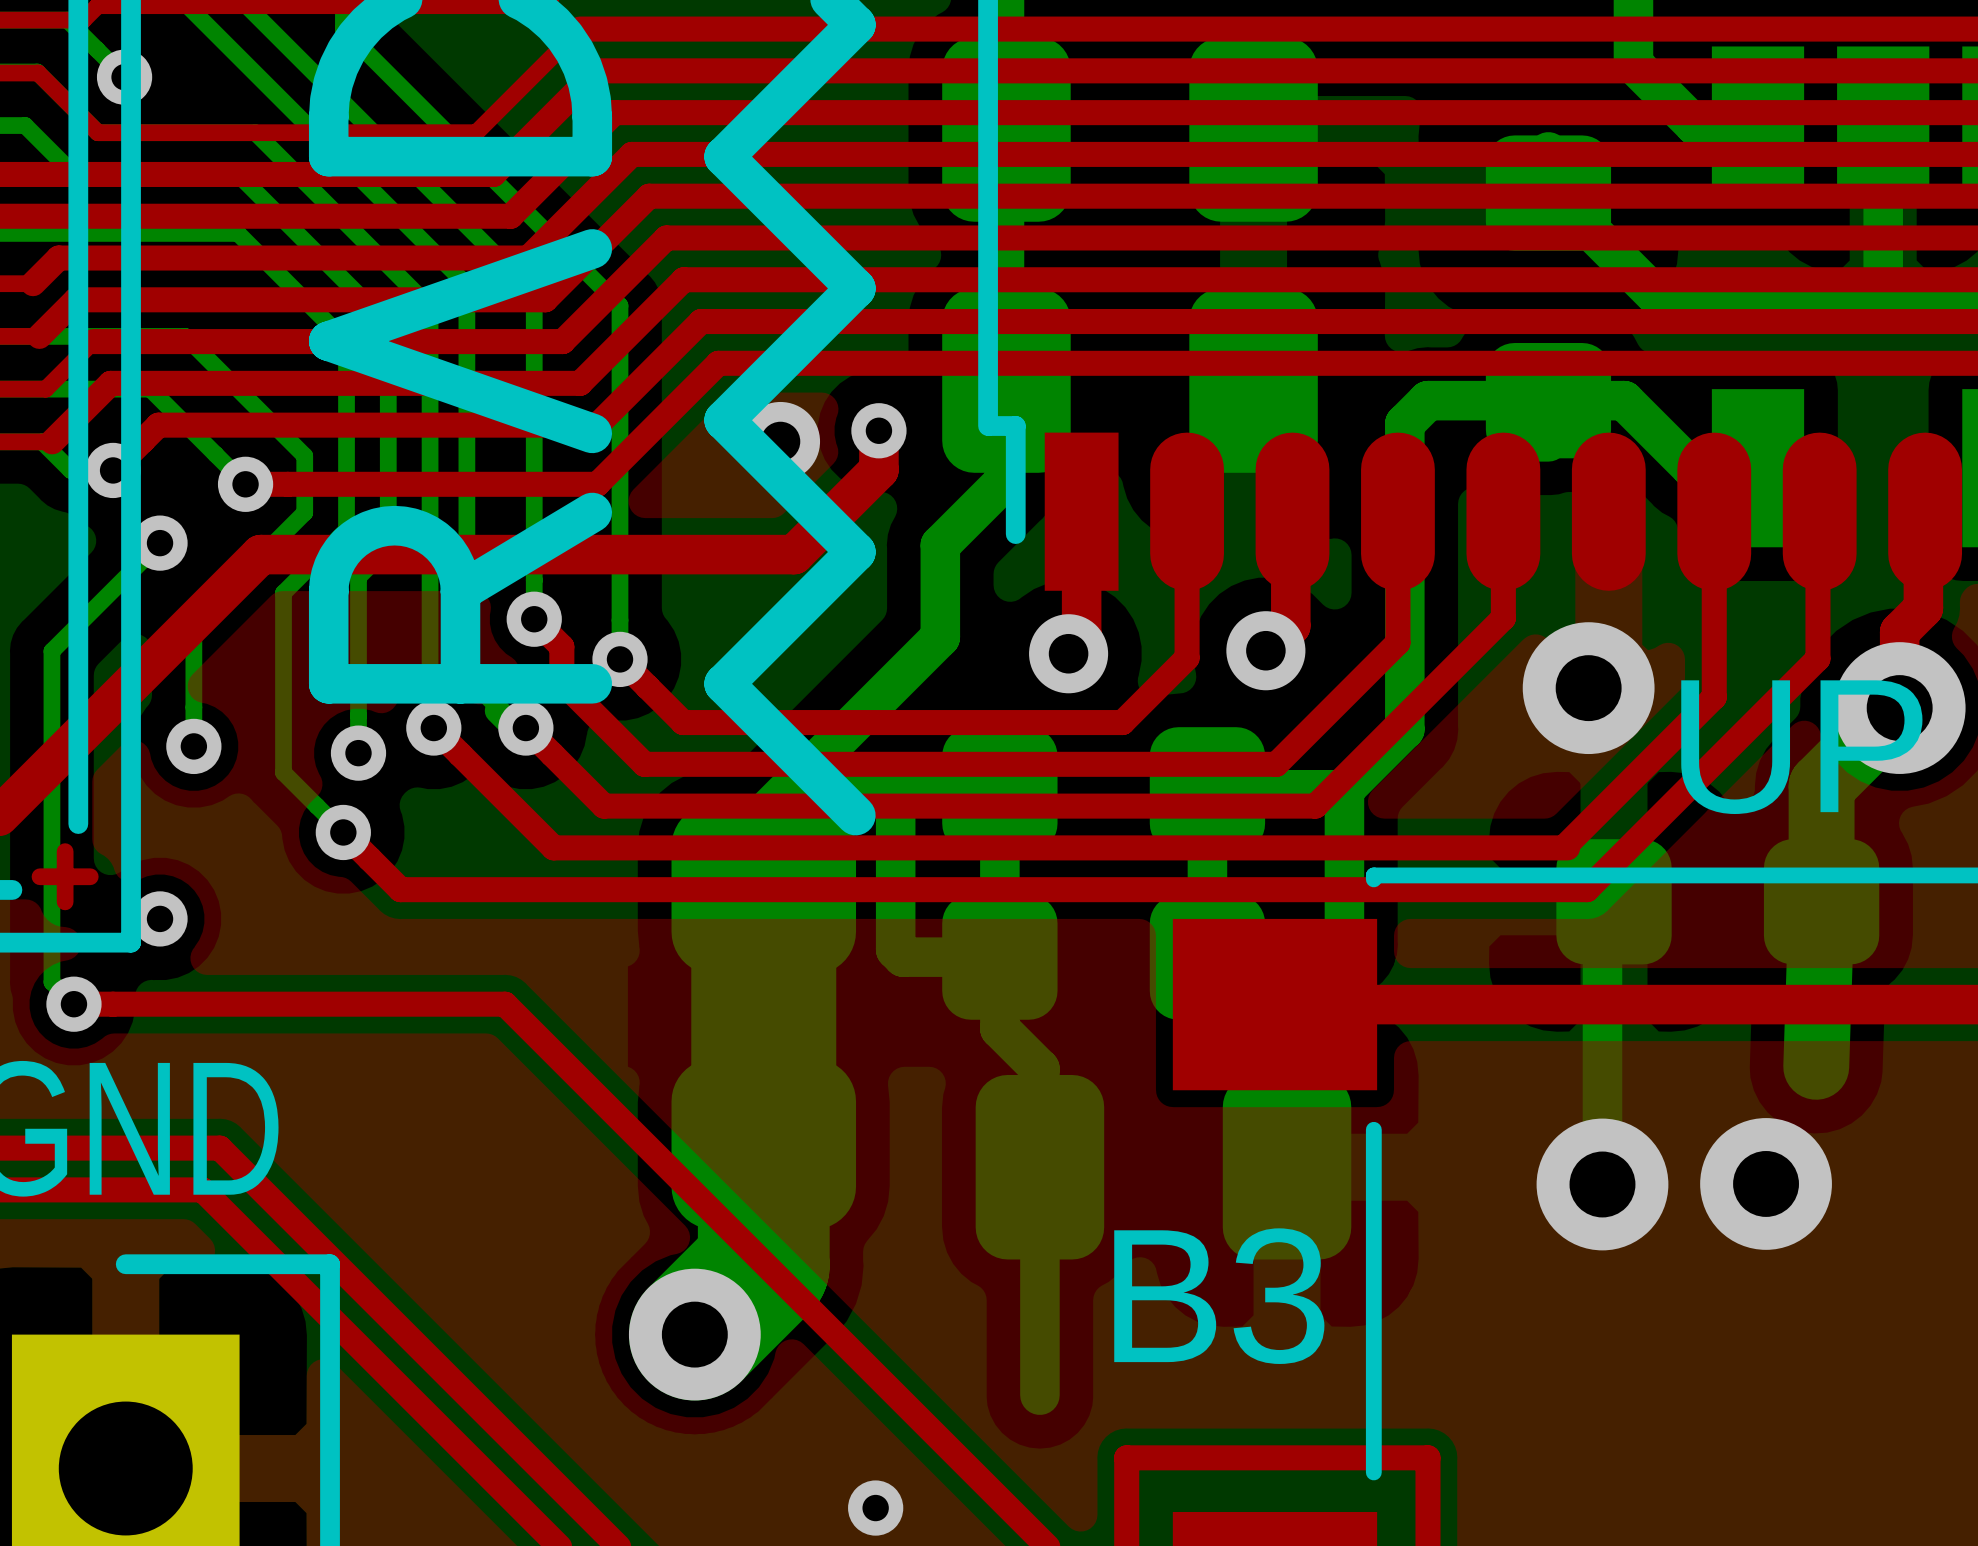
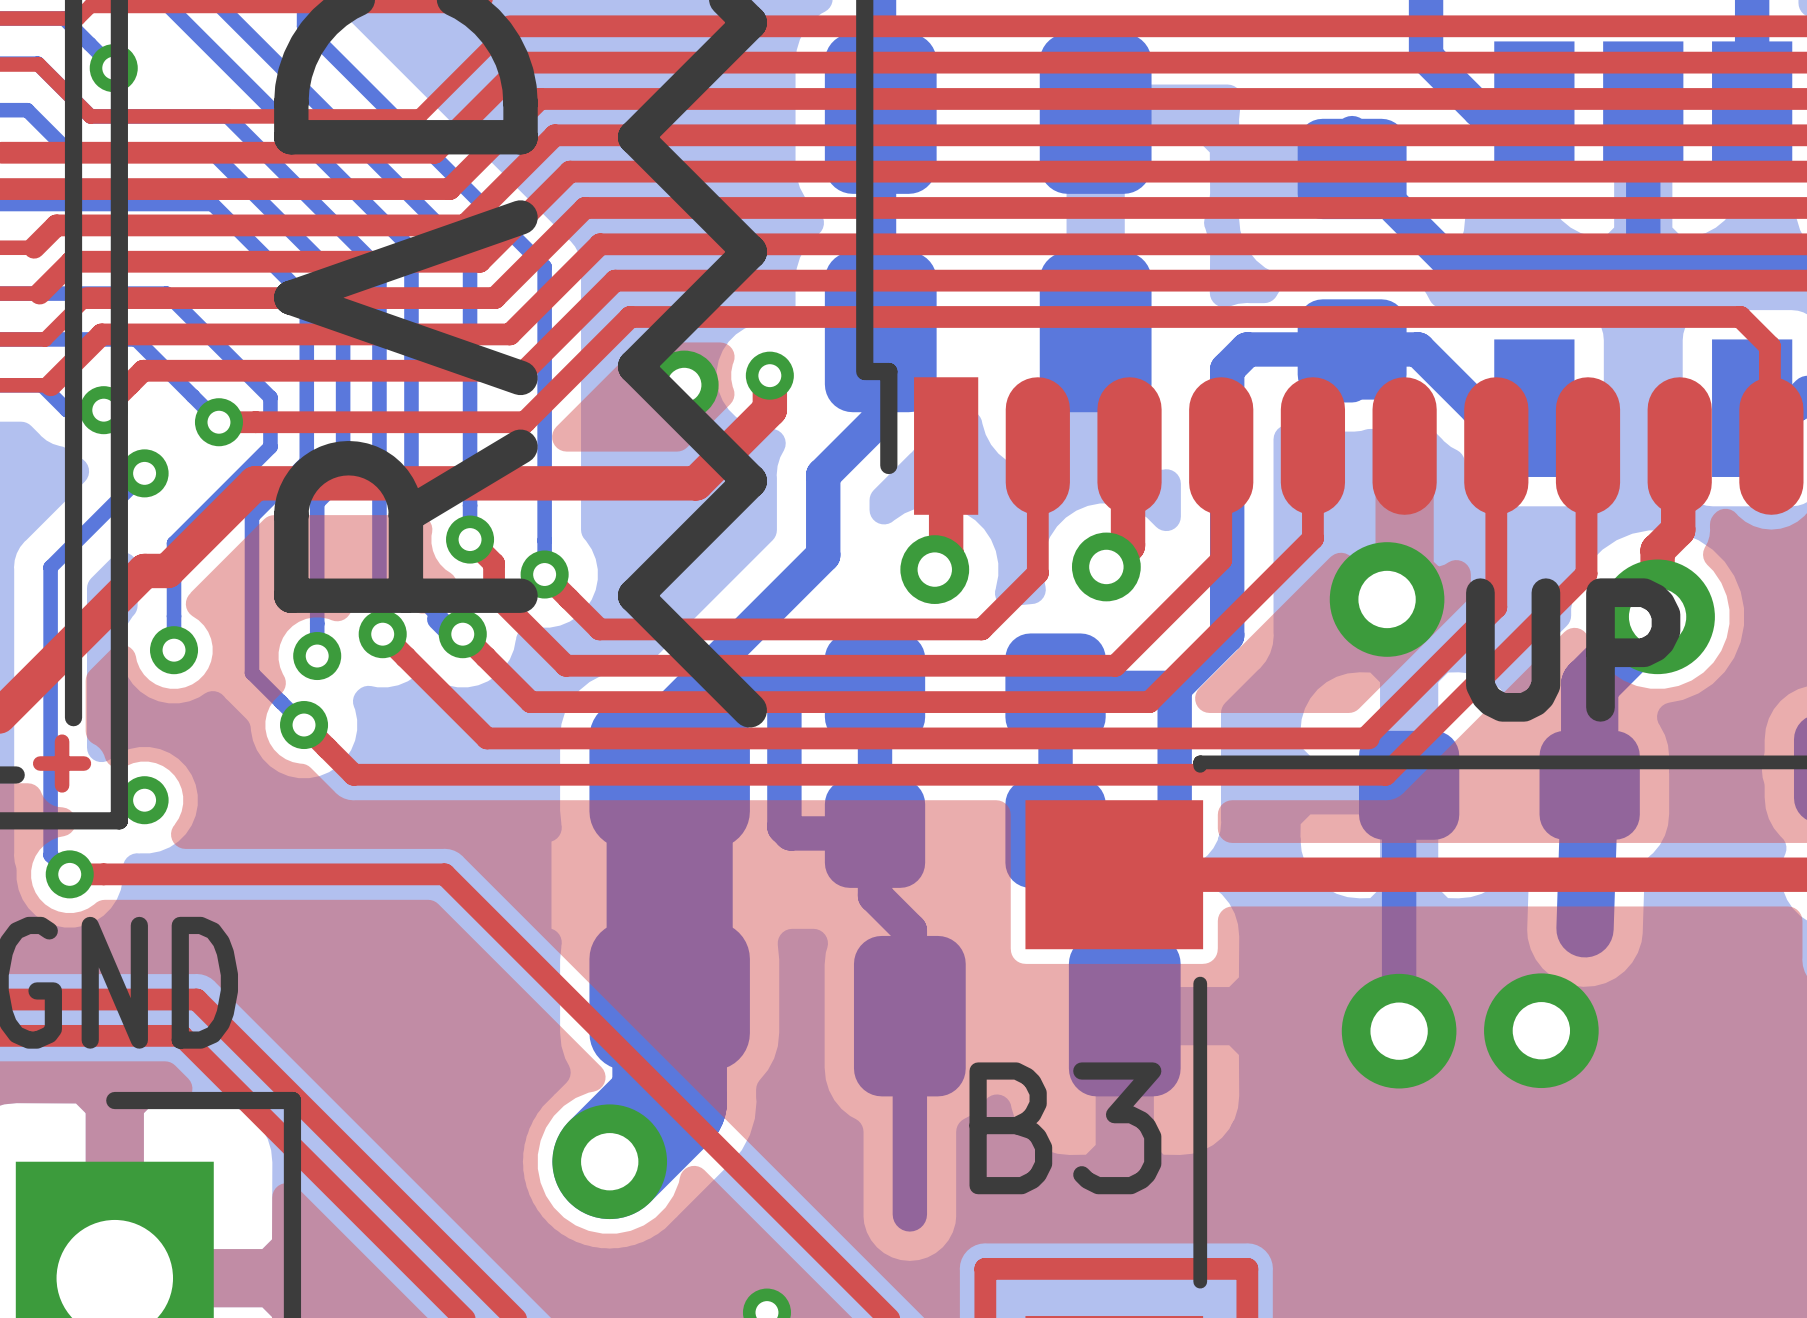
top track: (287, 554) (260, 554) (160, 655) -> (255, 483) (167, 570) (144, 570)

